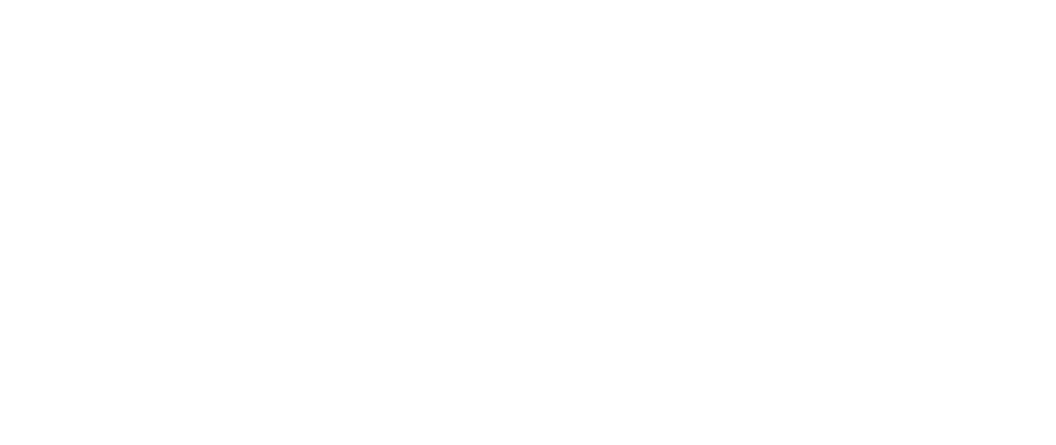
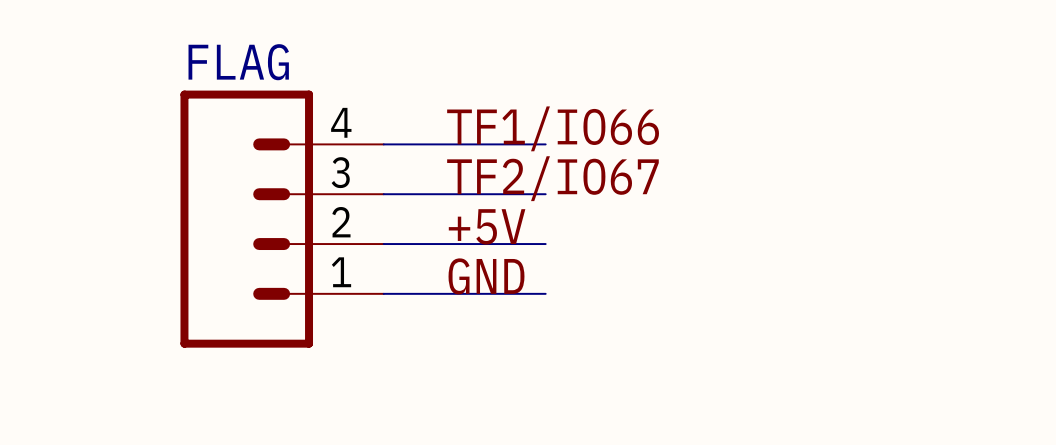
label: none -> TF1/IO66 (553, 128)
wire: none -> (383, 144) (545, 144)
label: none -> TF2/IO67 (552, 178)
wire: none -> (383, 194) (545, 194)
FLAG: none -> (282, 219)
label: none -> +5V (487, 226)
wire: none -> (383, 244) (545, 244)
label: none -> GND (486, 276)
wire: none -> (383, 293) (545, 293)

